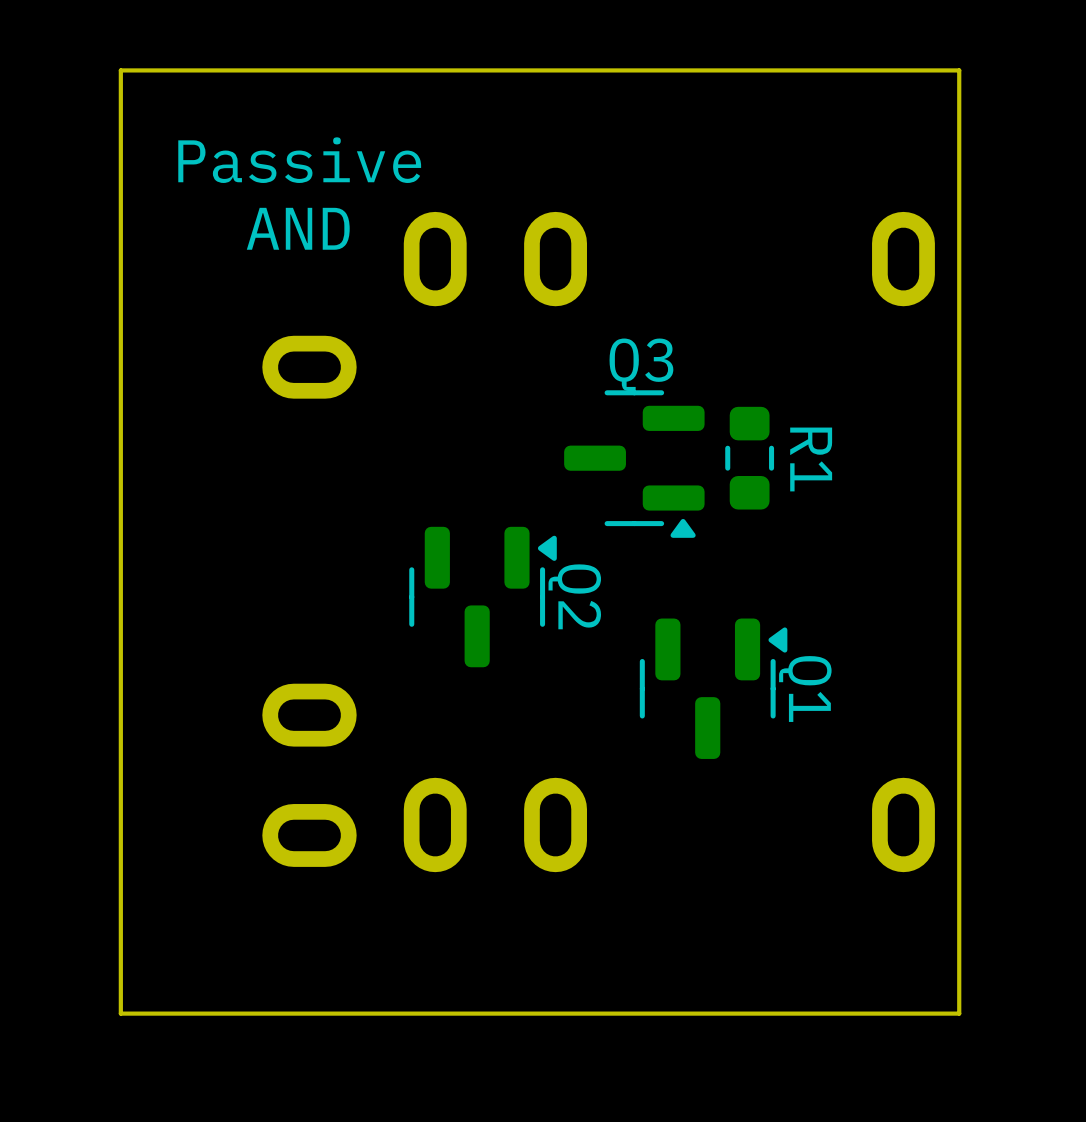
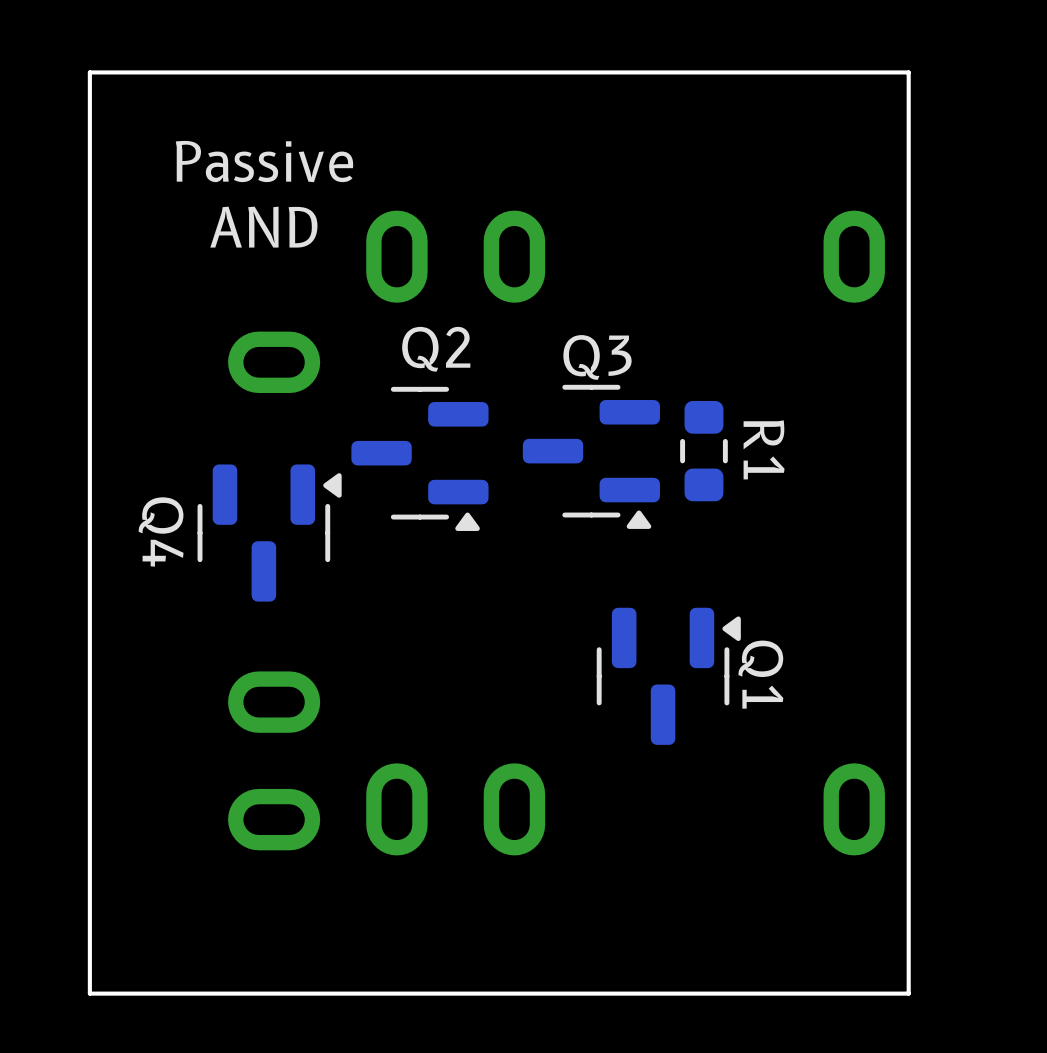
Q4: none -> (269, 533)
Q2 name position: Q2 (574, 596) -> Q2 (436, 349)
Q2 rotation: 0° (483, 597) -> 90° clockwise (419, 458)
Q2 position: (483, 597) -> (419, 458)

